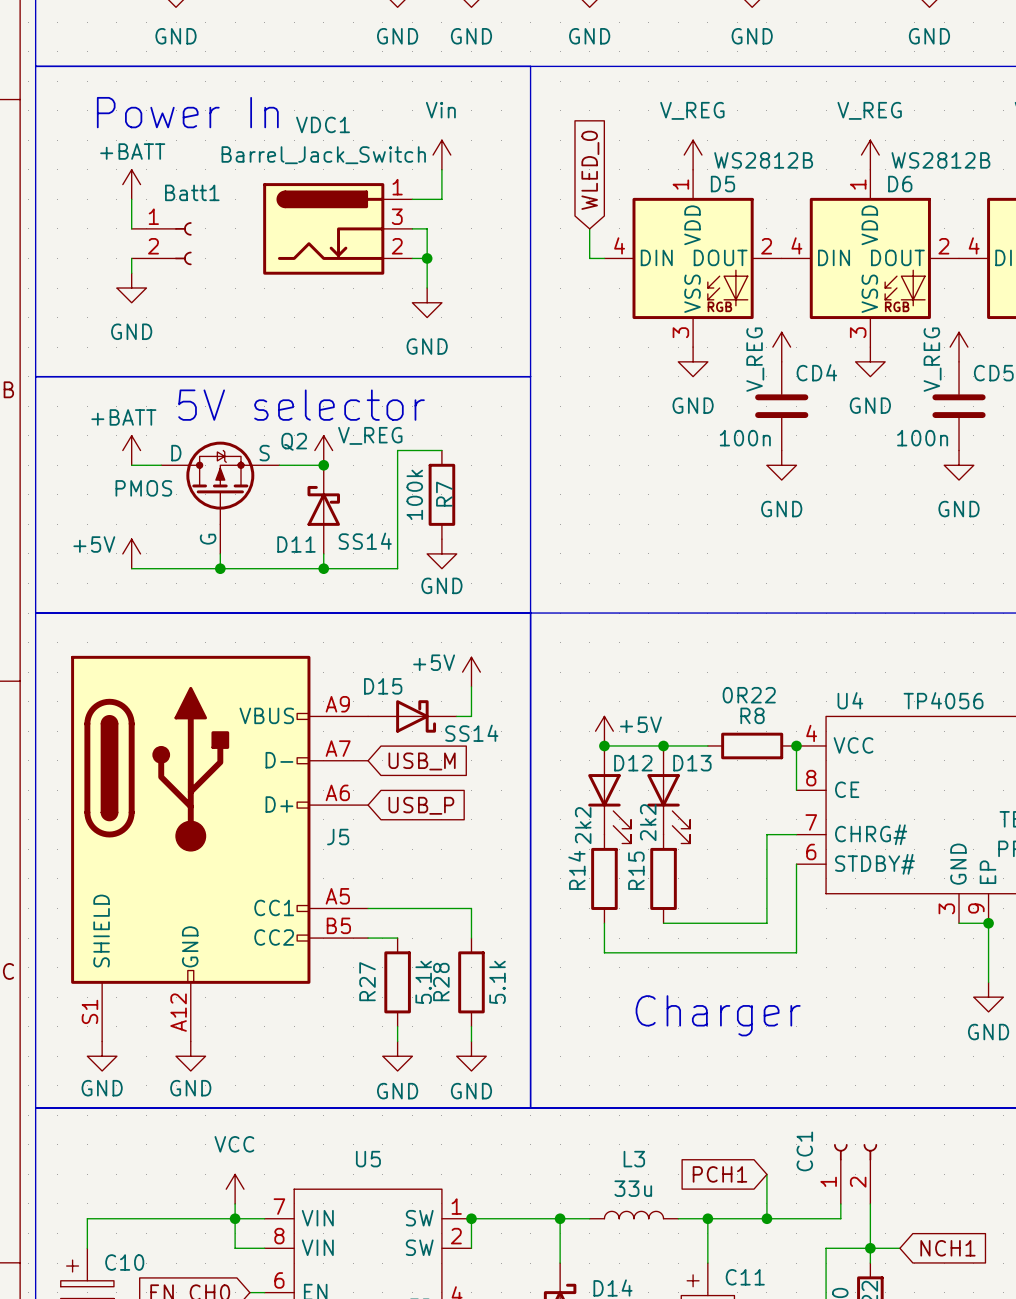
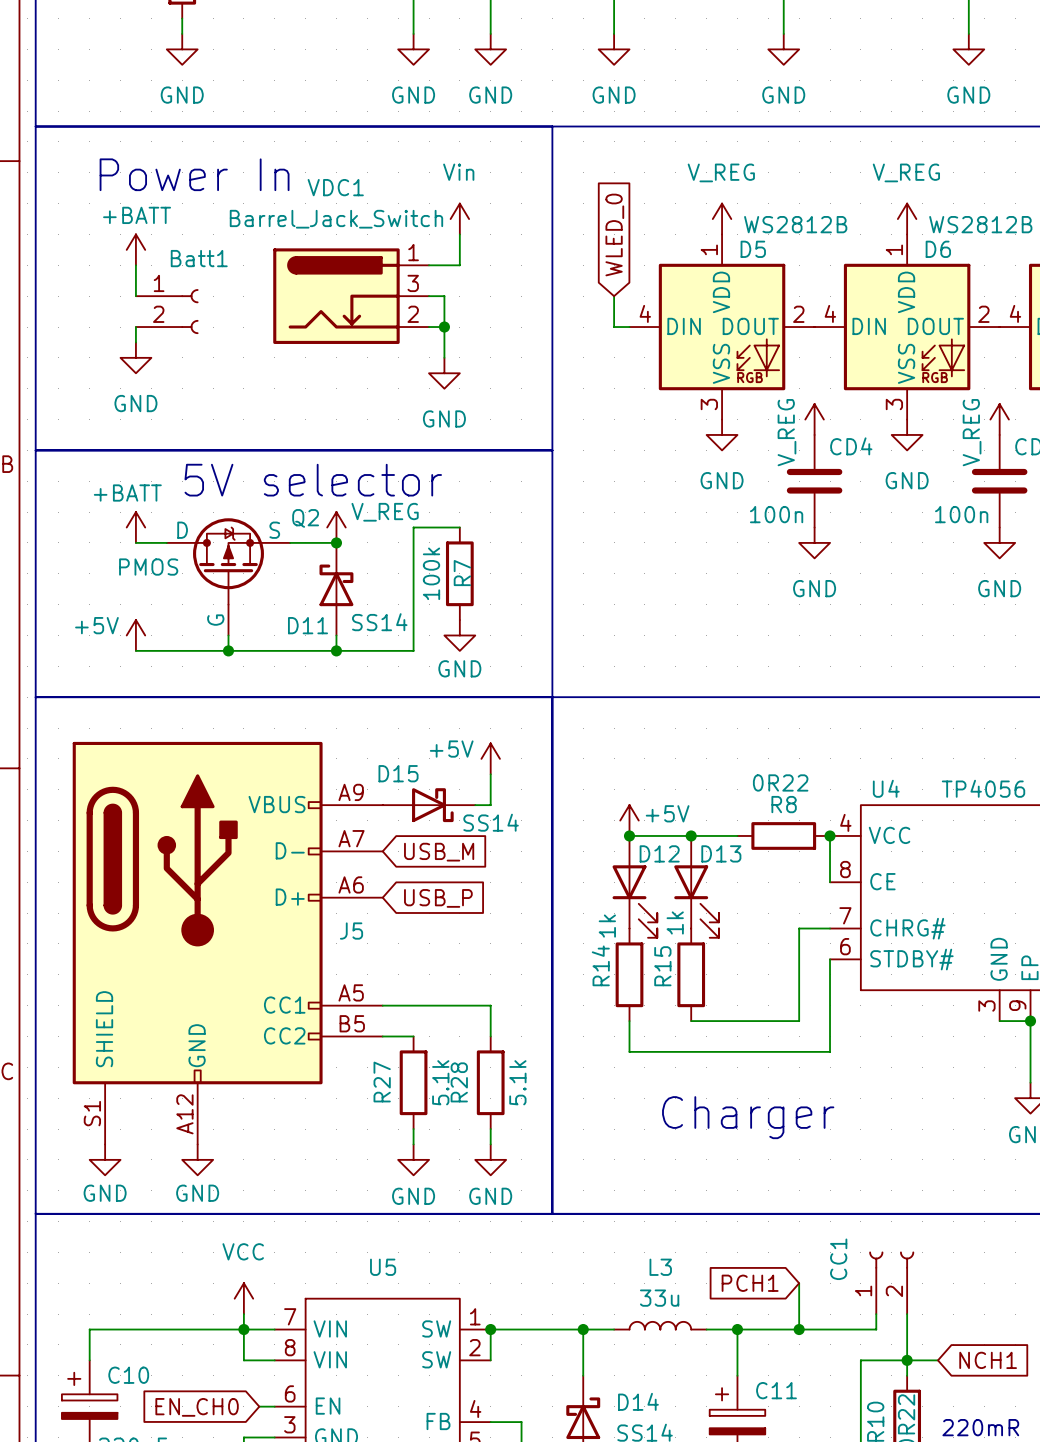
R15 value: 2k2 (648, 822) -> 1k (675, 922)
R14 value: 2k2 (583, 825) -> 1k (607, 926)

